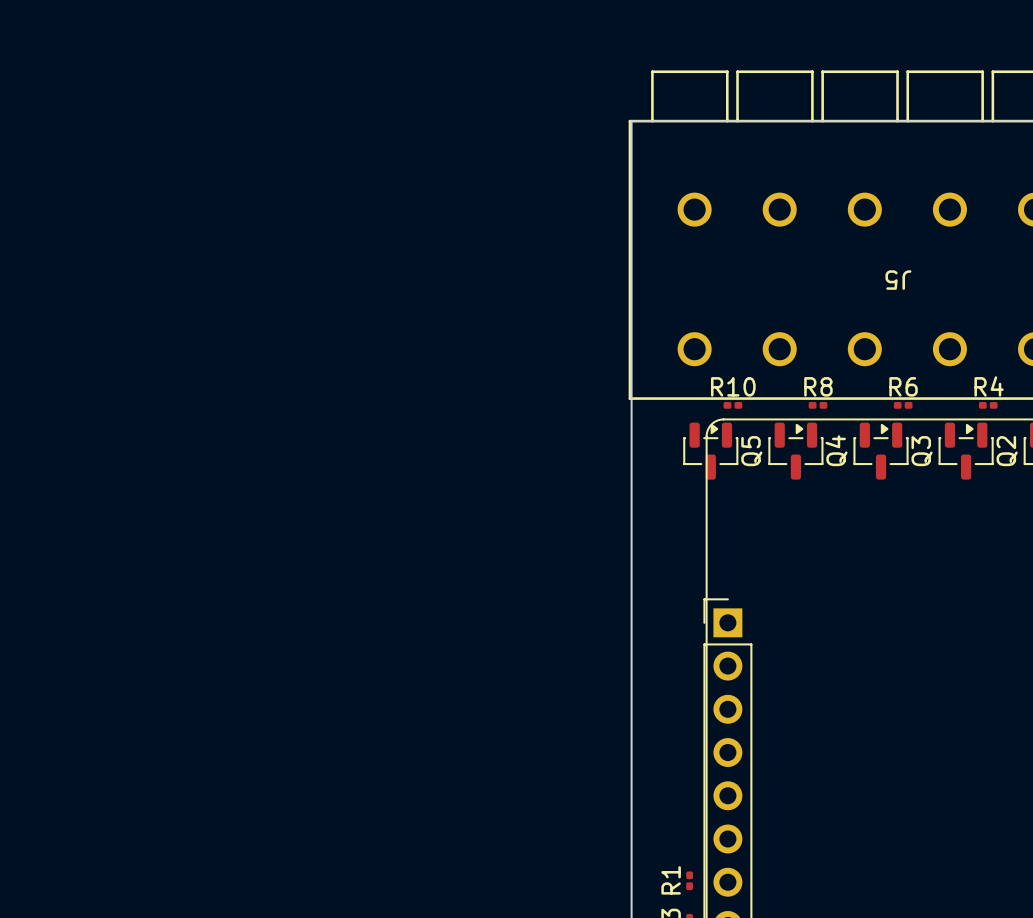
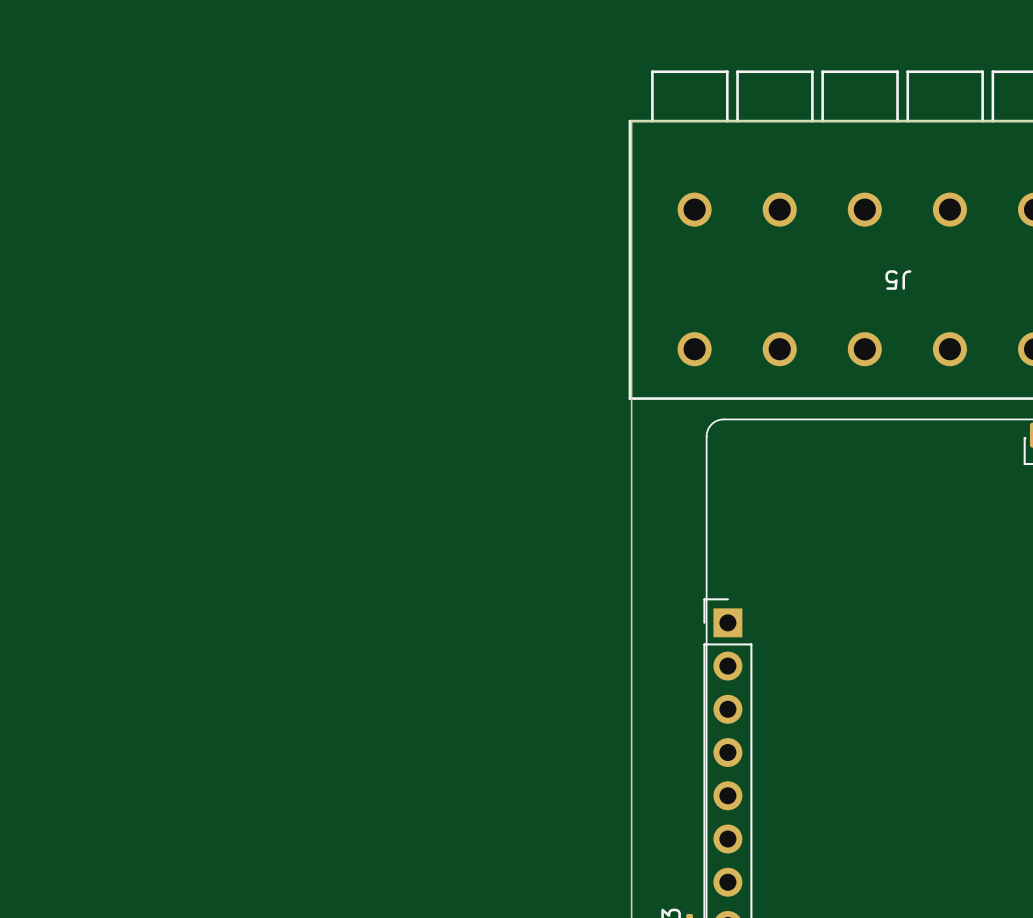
R10: (732, 405) -> none
R8: (818, 405) -> none
R6: (903, 405) -> none
R4: (988, 405) -> none
Q5: (710, 451) -> none
Q4: (795, 451) -> none
Q3: (881, 451) -> none
Q2: (966, 451) -> none
R1: (689, 880) -> none

